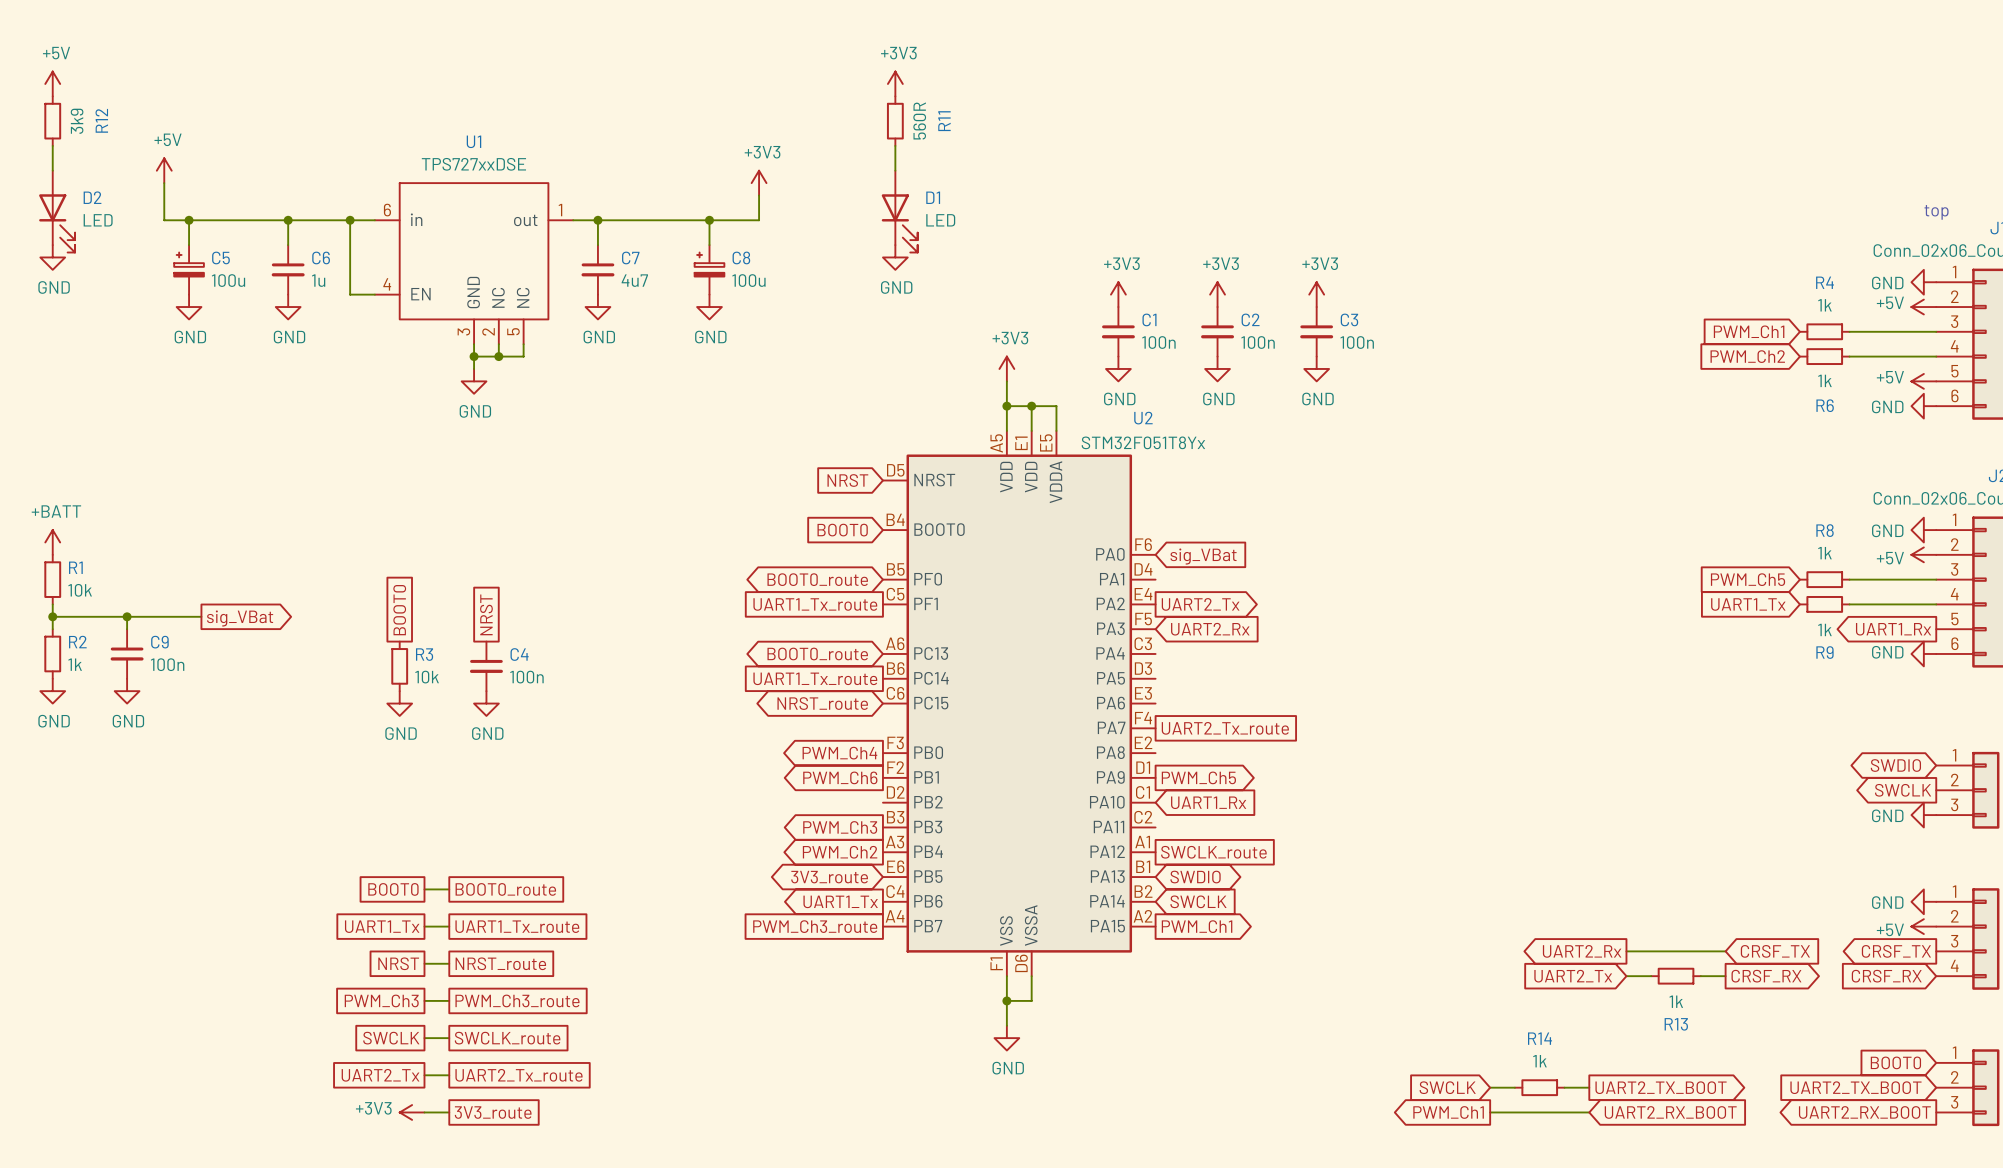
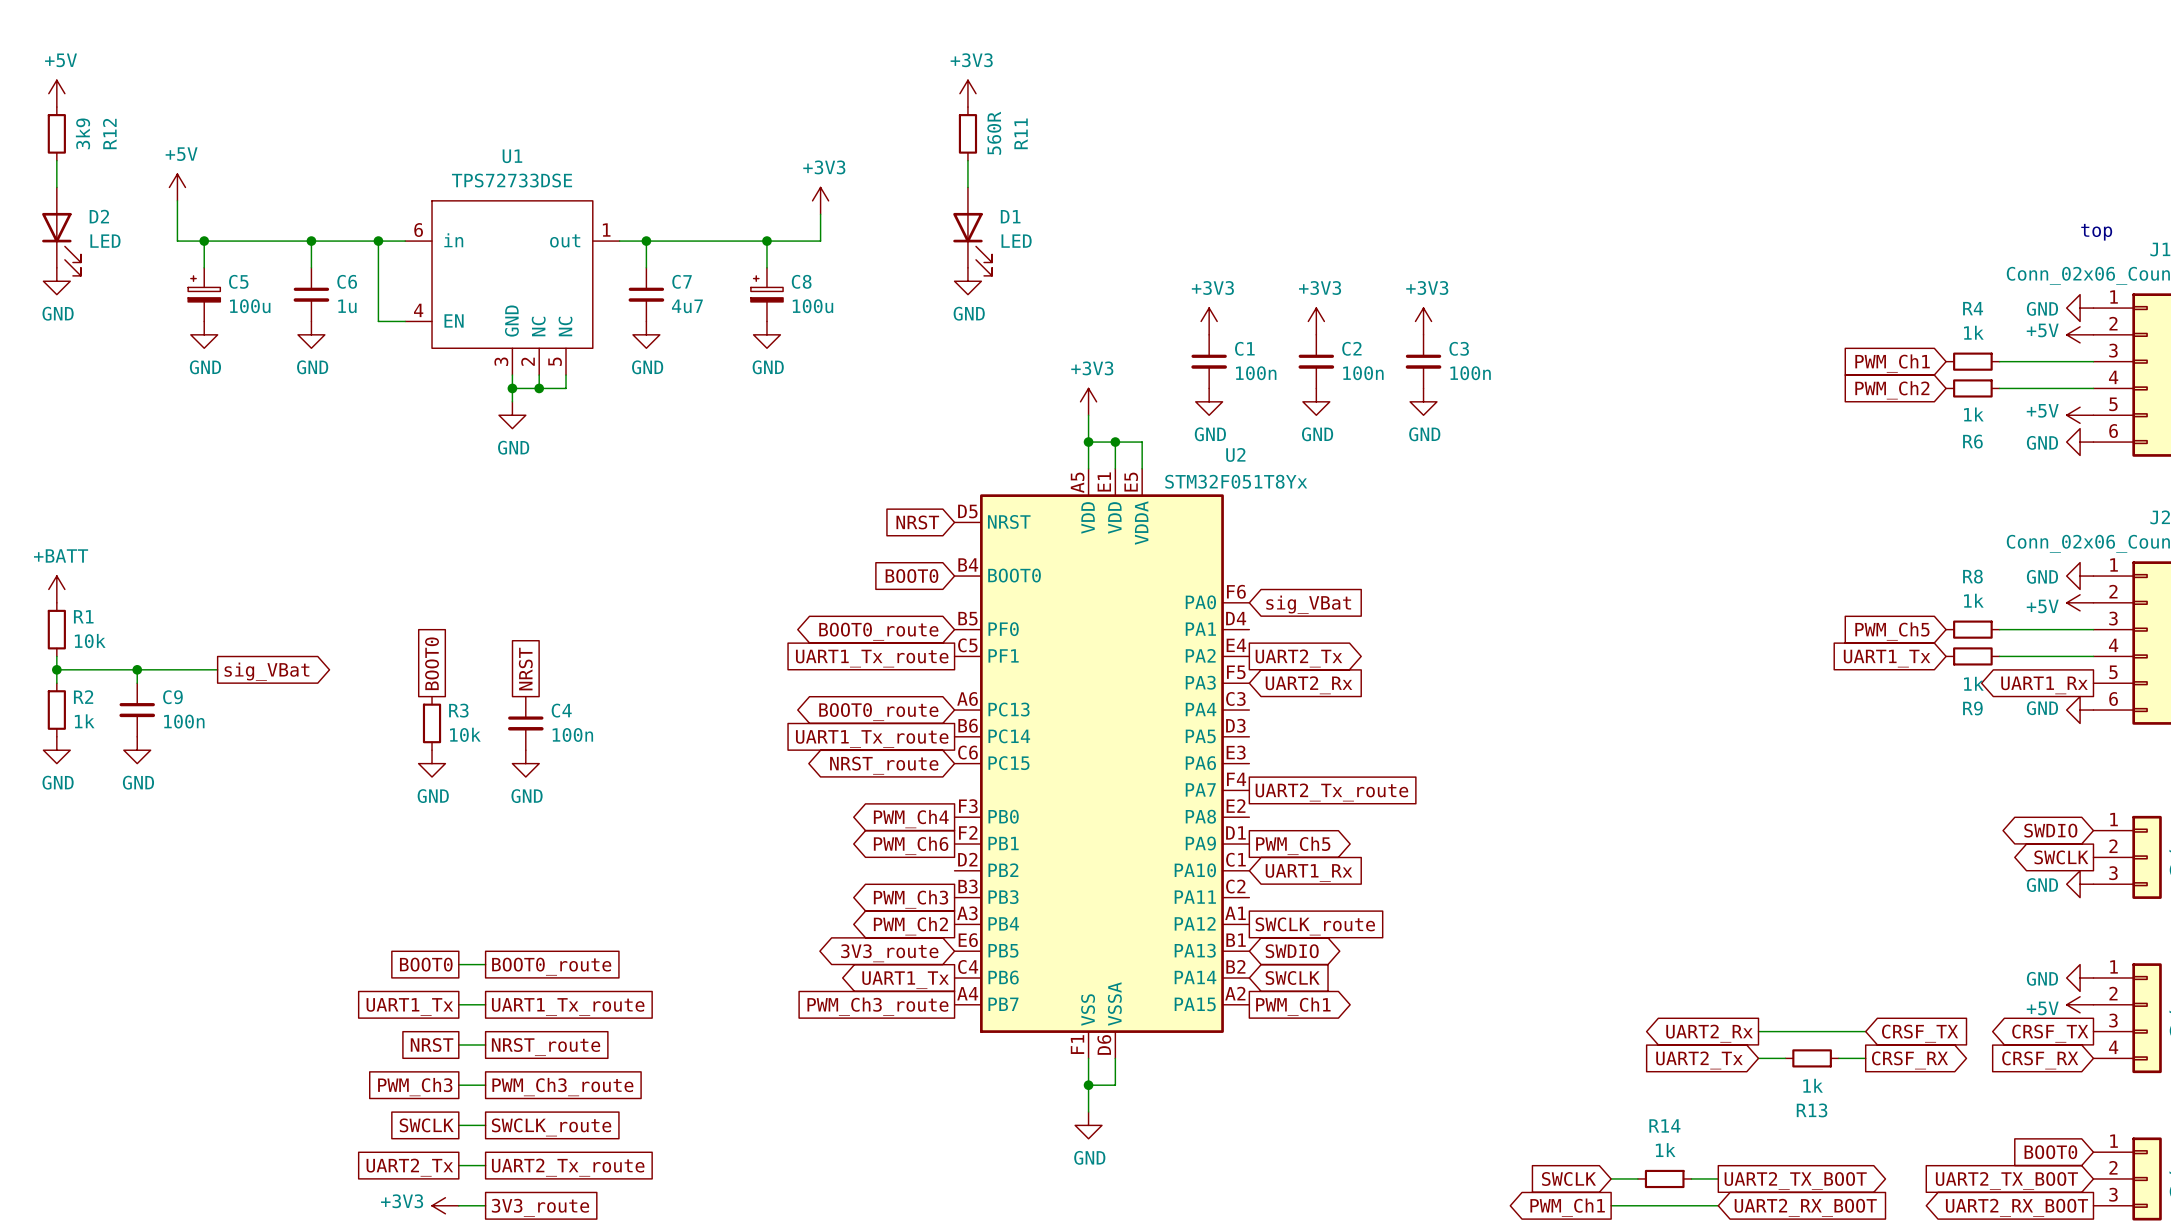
U1 value: TPS727xxDSE (473, 164) -> TPS72733DSE (512, 180)

